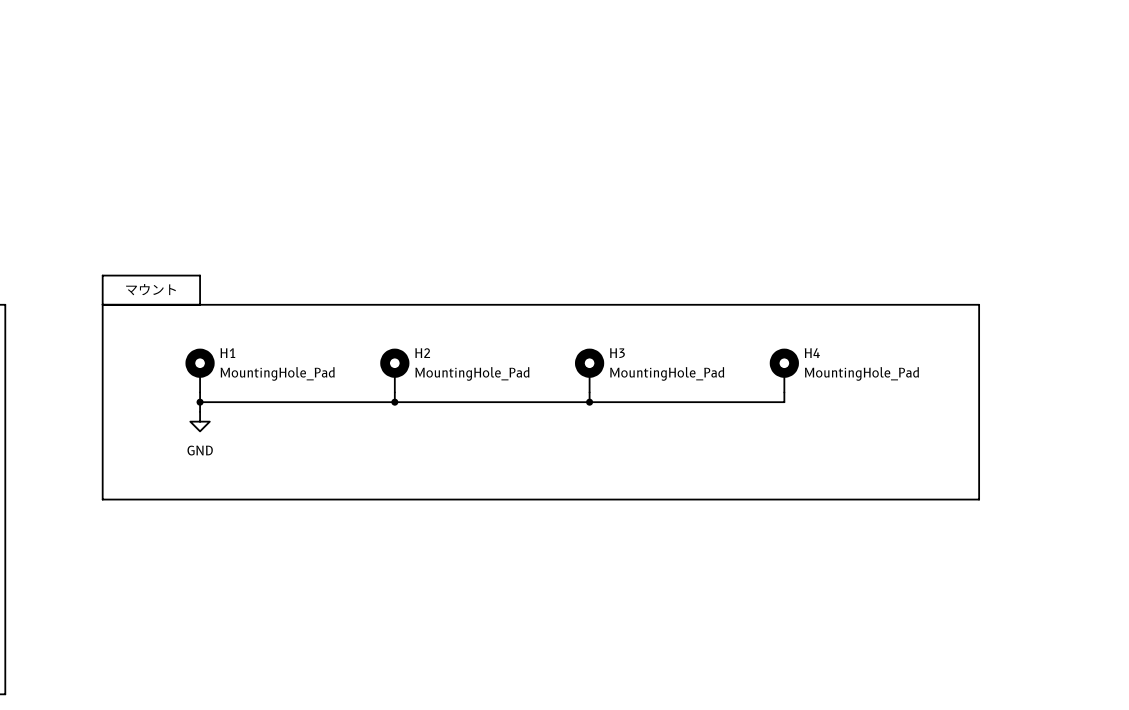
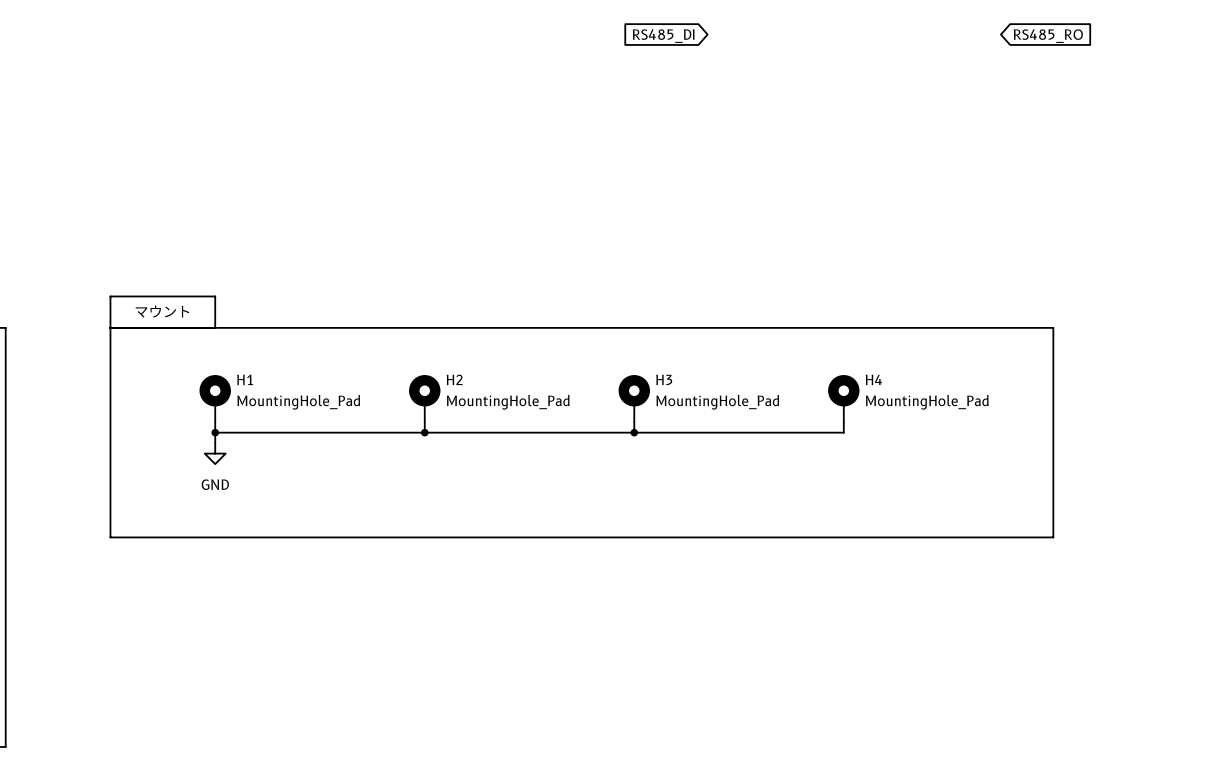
global label: none -> RS485_DI (663, 36)
global label: none -> RS485_RO (1048, 36)

